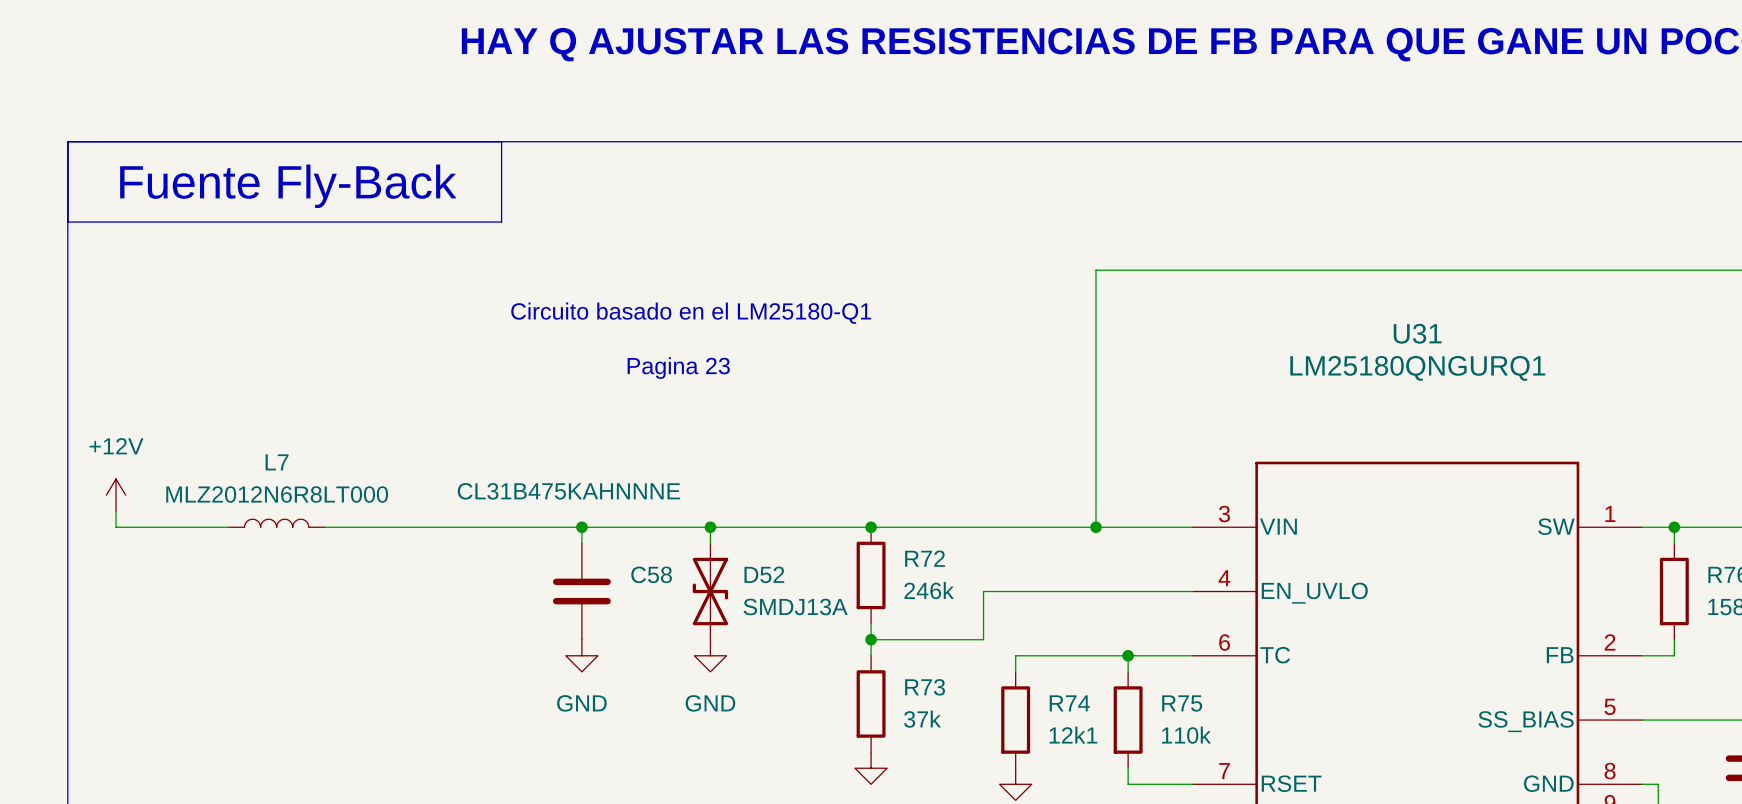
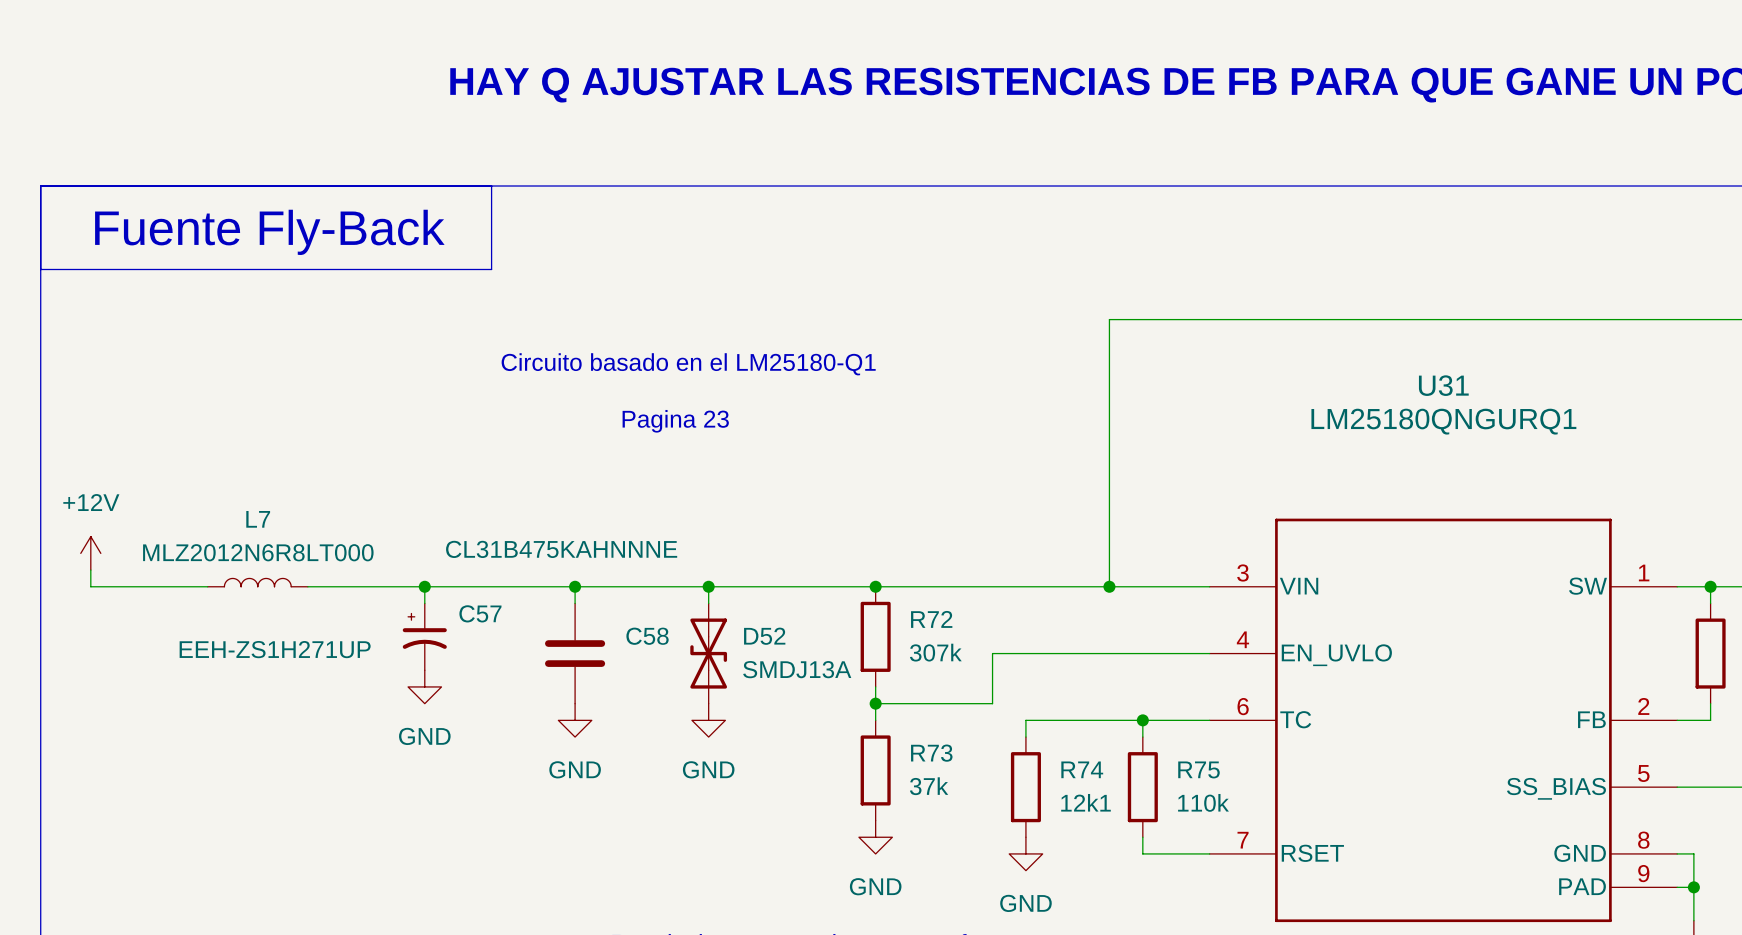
wire: none -> (424, 586) (424, 603)
junction: none -> (424, 586)
C57: none -> EEH-ZS1H271UP (424, 636)
R72 value: 246k (929, 590) -> 307k (935, 652)
power symbol: none -> GND (424, 686)

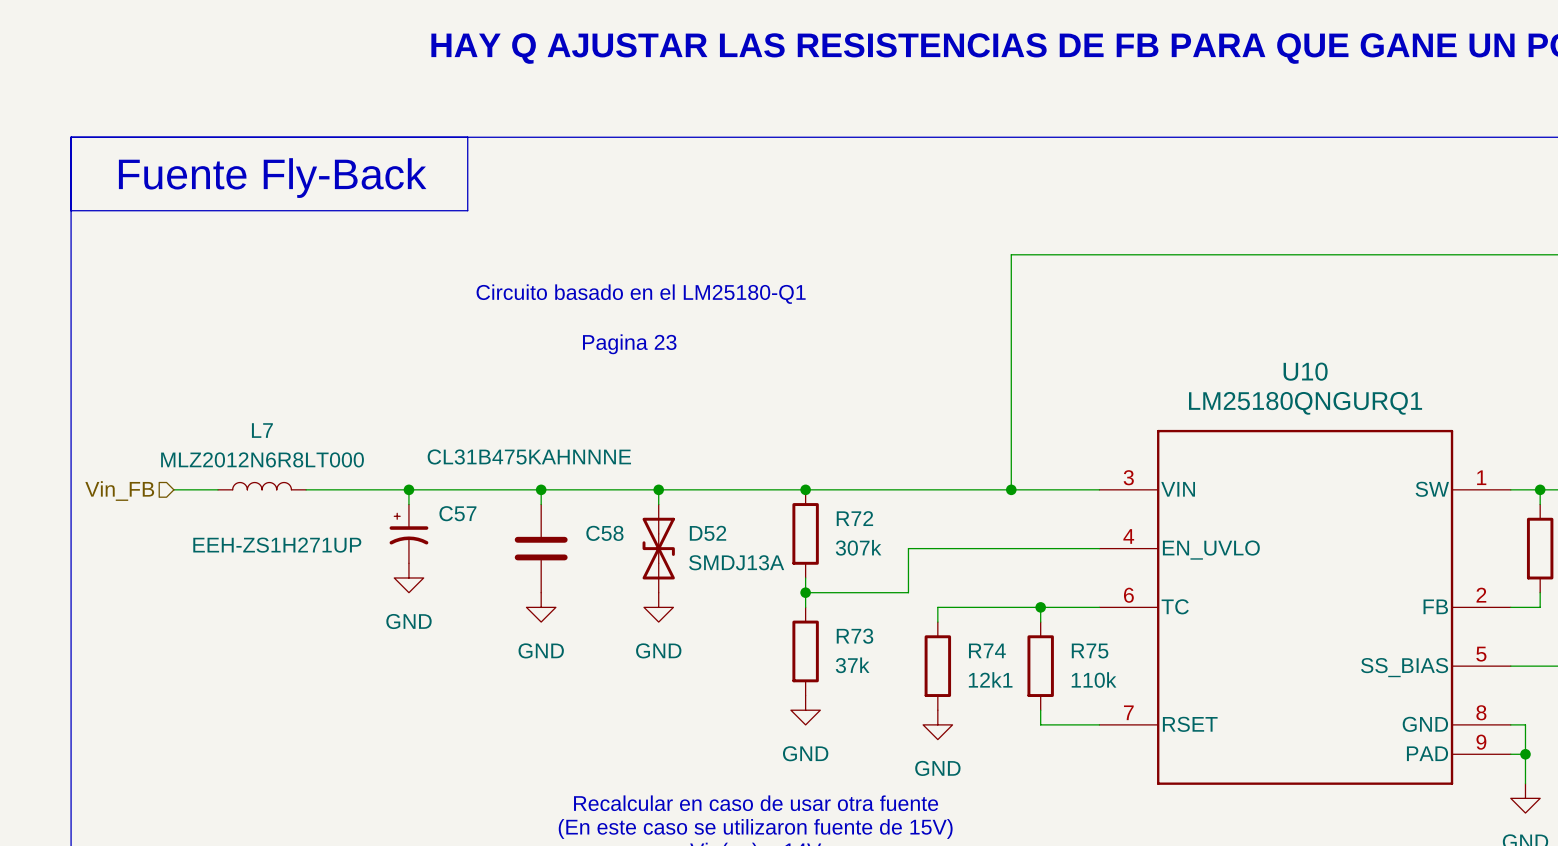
U31 name: U31 (1443, 385) -> U10 (1305, 371)
U31 value position: LM25180QNGURQ1 (1443, 421) -> LM25180QNGURQ1 (1305, 403)
power symbol: +12V (90, 553) -> none
wire: (90, 570) (90, 586) (157, 586) -> none
hierarchical label: none -> Vin_FB (119, 491)

